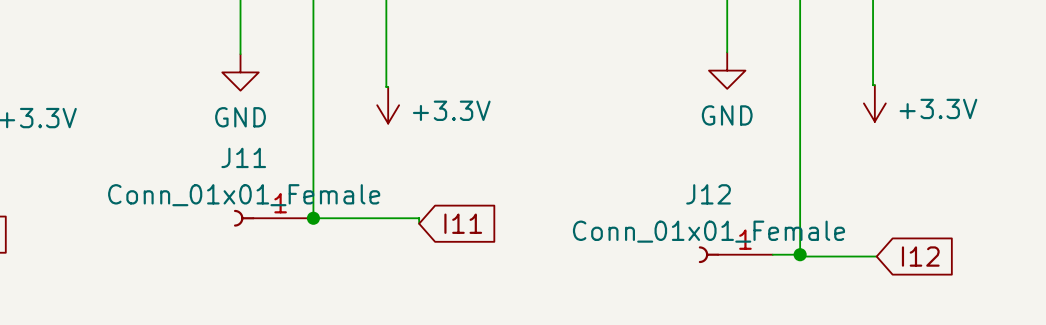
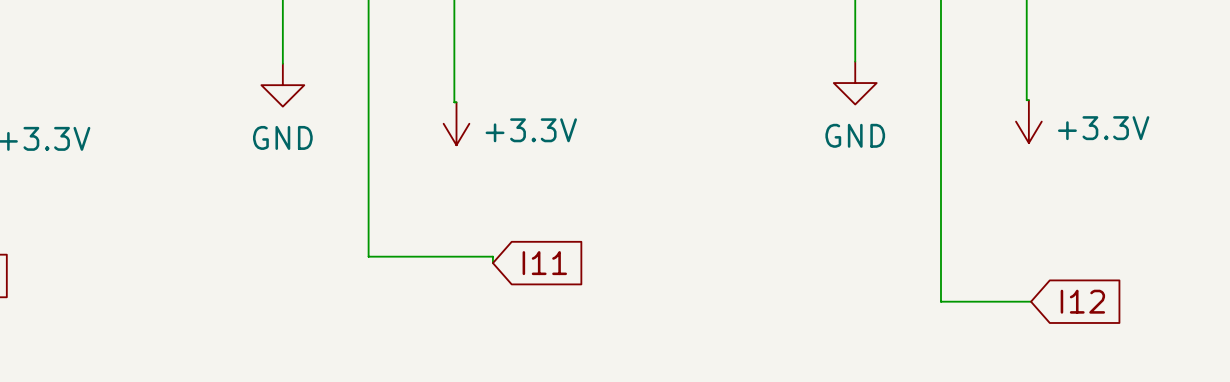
J11: Conn_01x01_Female (270, 218) -> none
junction: (313, 218) -> none
J12: Conn_01x01_Female (735, 254) -> none
wire: (772, 254) (800, 254) -> none
junction: (800, 254) -> none

